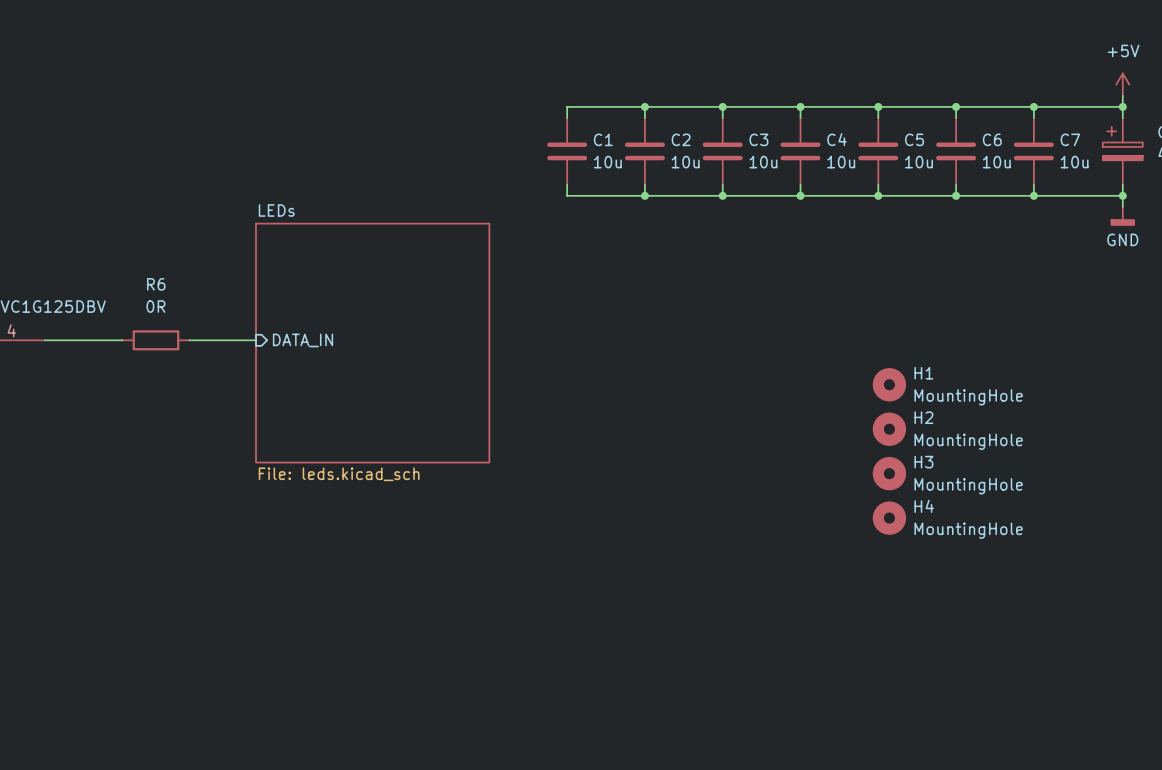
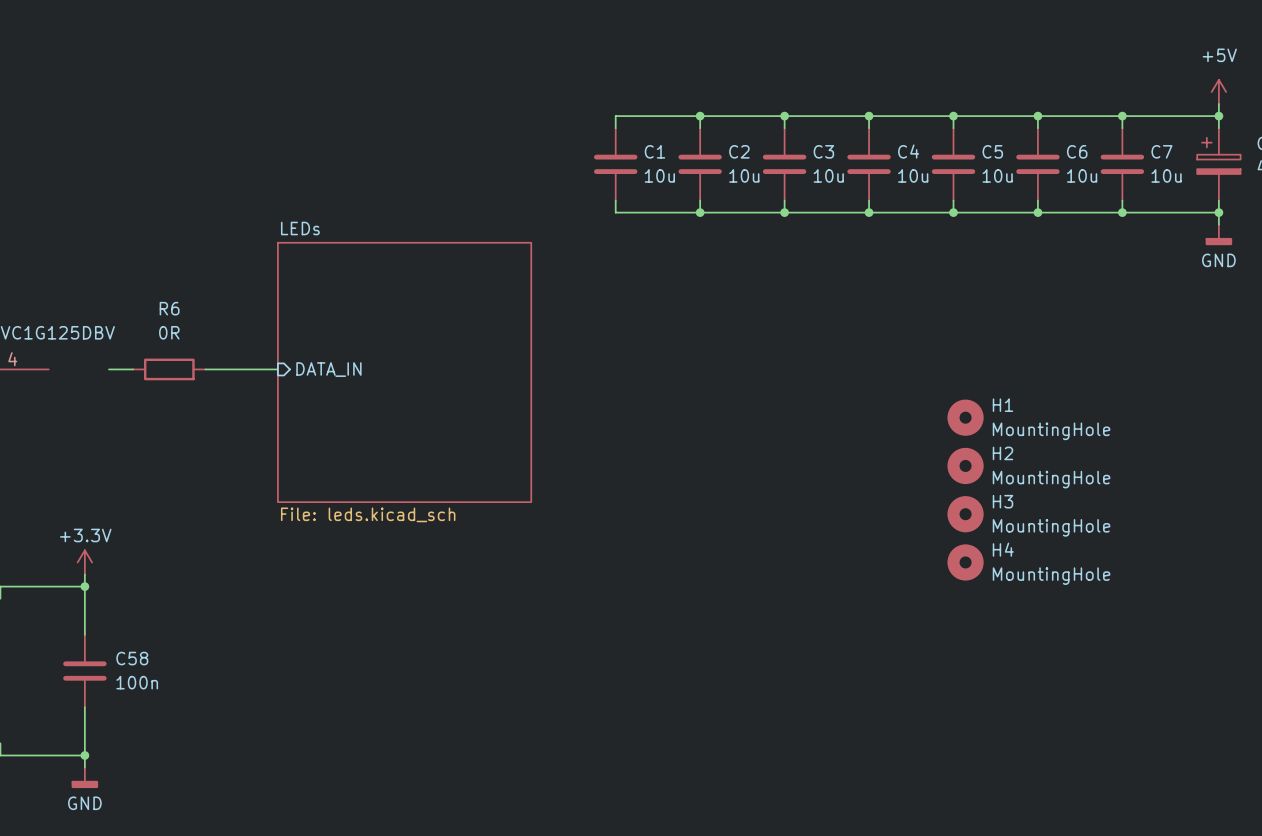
wire: (44, 340) (100, 340) -> none
power symbol: none -> +3.3V (84, 562)
wire: none -> (84, 574) (84, 634)
wire: none -> (84, 586) (0, 586) (0, 598)
junction: none -> (84, 586)
C58: none -> 100n (84, 671)
wire: none -> (84, 707) (84, 767)
wire: none -> (0, 743) (0, 755) (84, 755)
junction: none -> (84, 755)
power symbol: none -> GND (84, 777)

